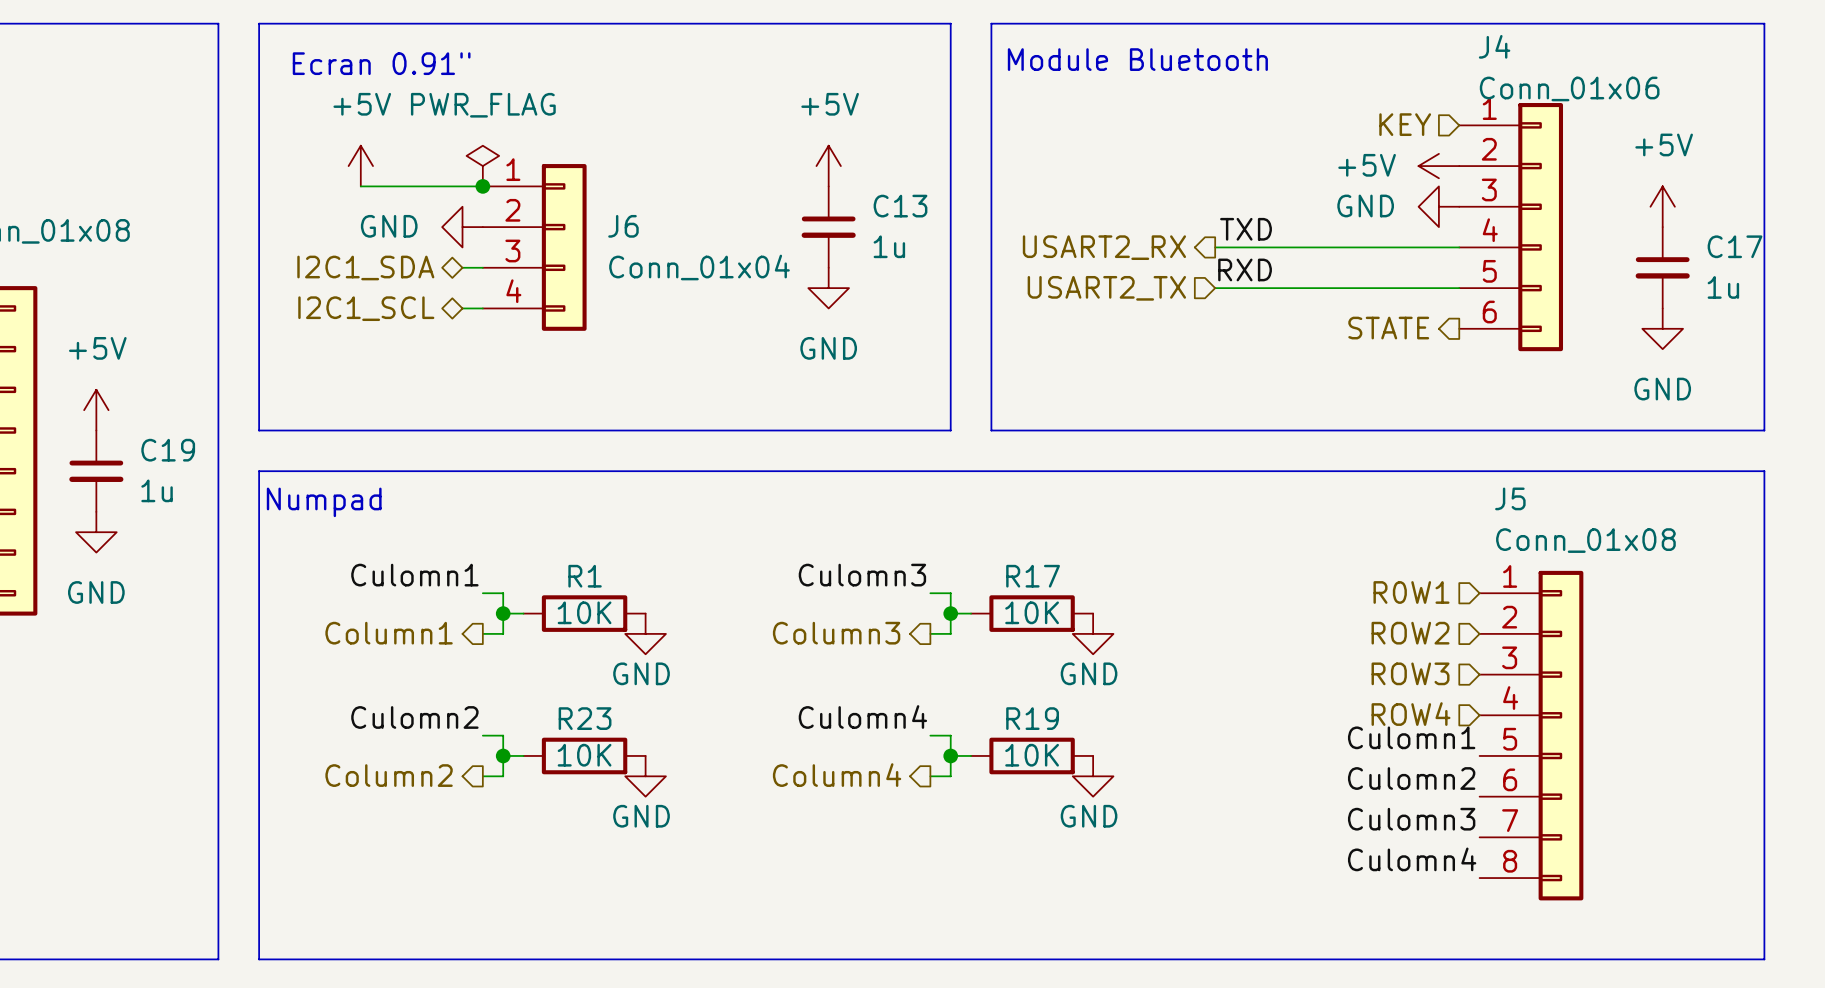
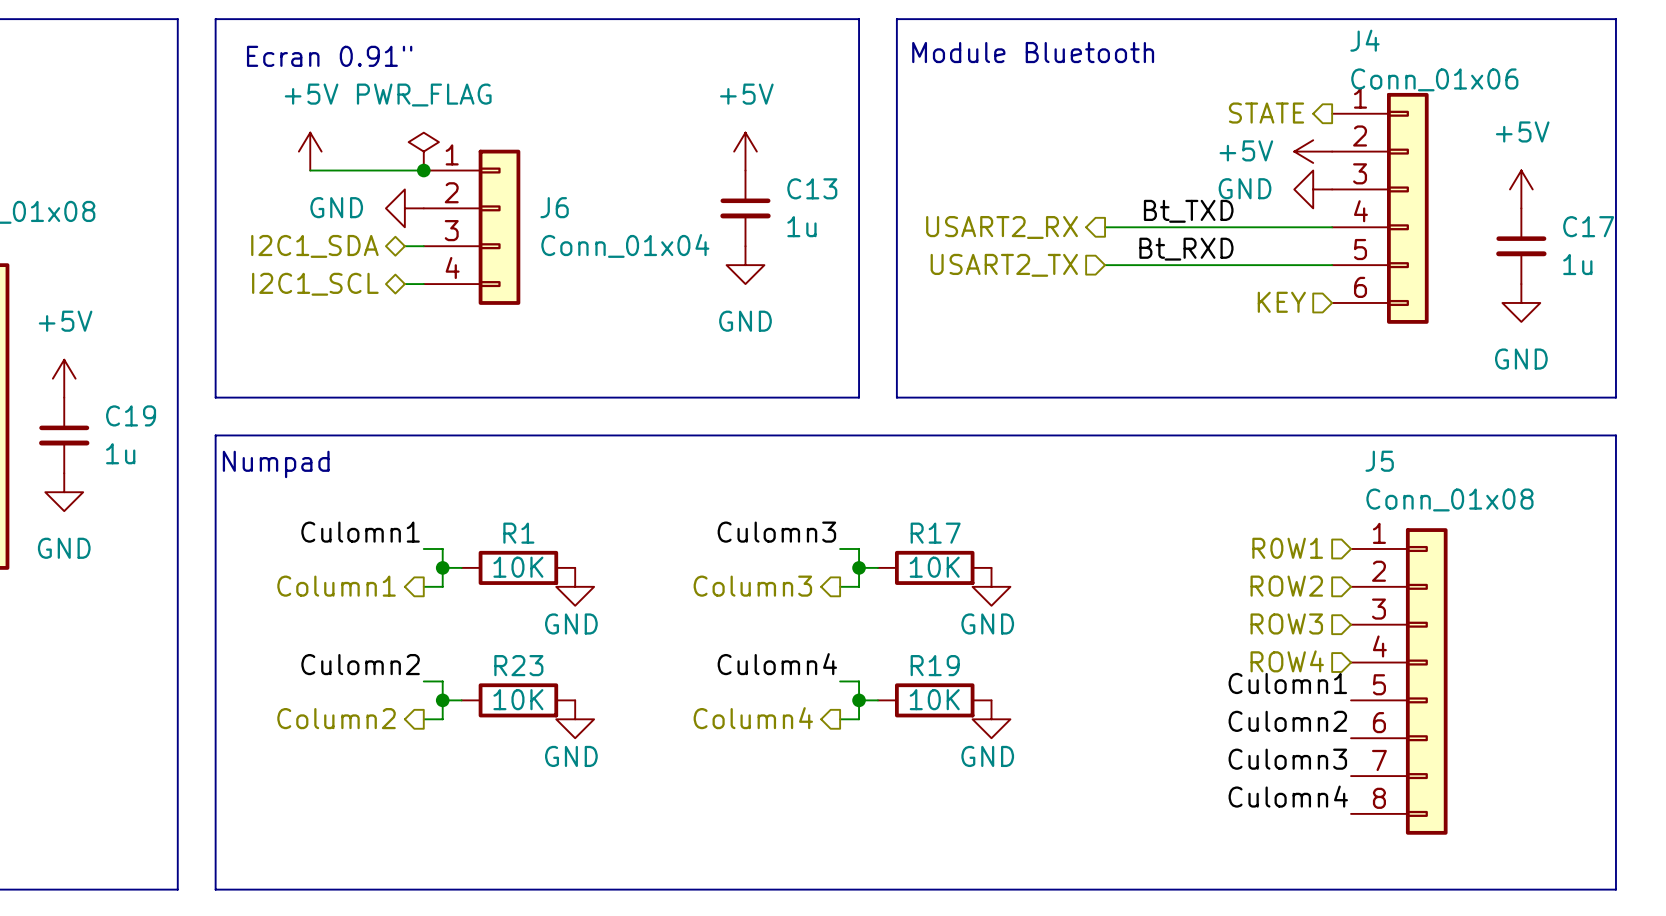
hierarchical label shape: input (1405, 124) -> output (1266, 113)
hierarchical label: KEY (1405, 124) -> STATE (1266, 113)
label: TXD (1246, 229) -> Bt_TXD (1188, 211)
label: RXD (1245, 269) -> Bt_RXD (1186, 249)
hierarchical label shape: output (1388, 328) -> input (1281, 302)
hierarchical label: STATE (1388, 328) -> KEY (1281, 302)

